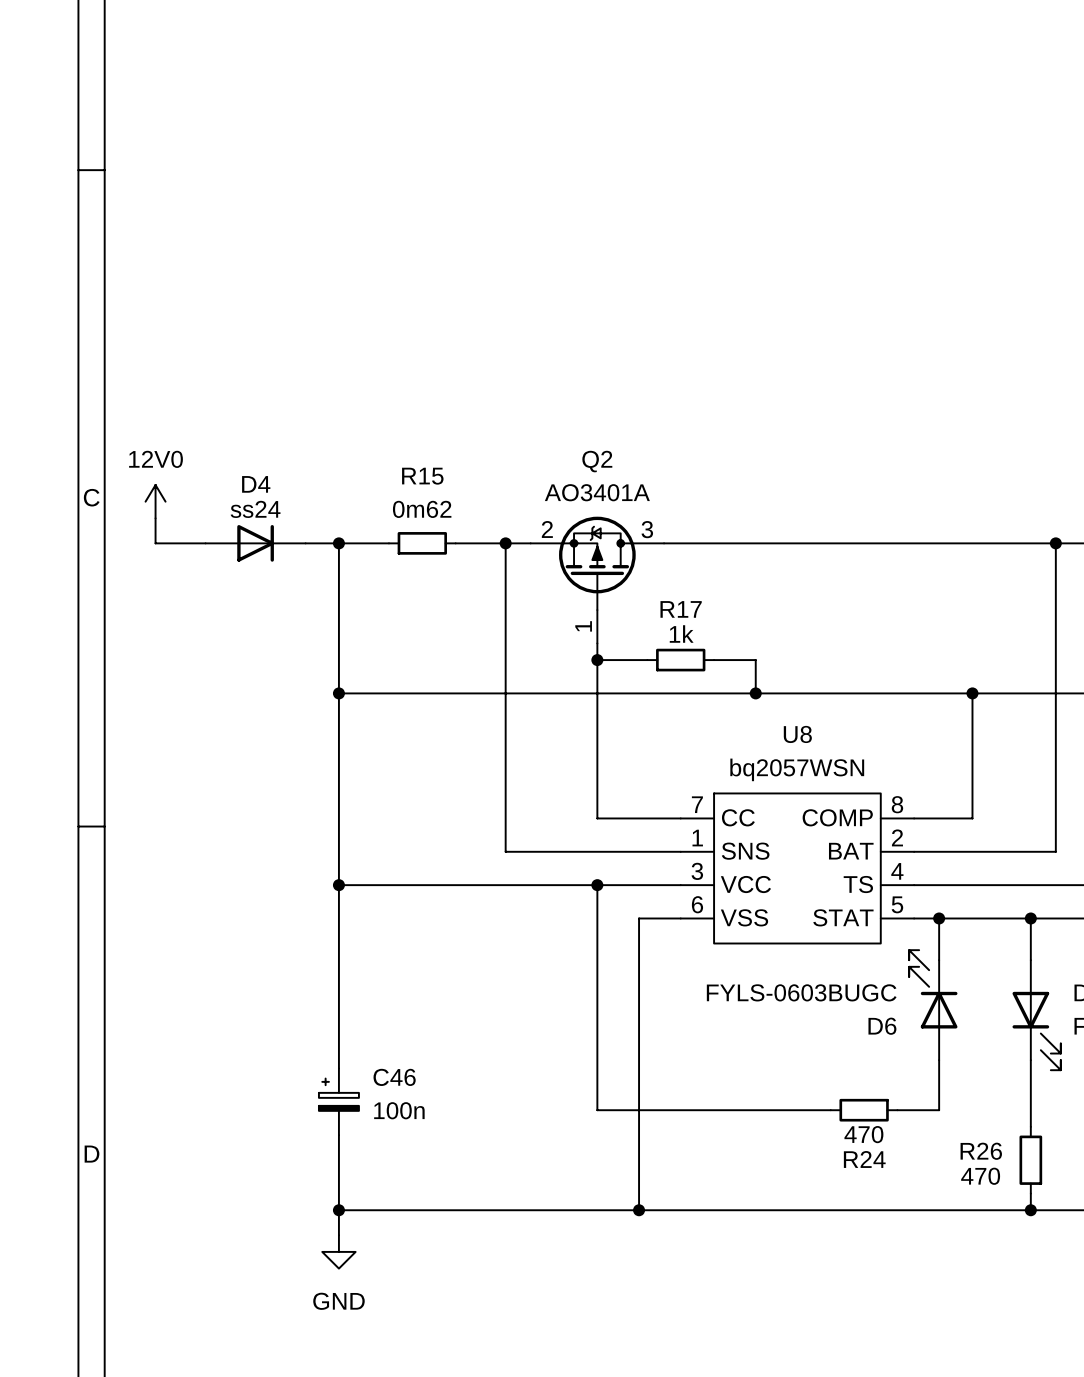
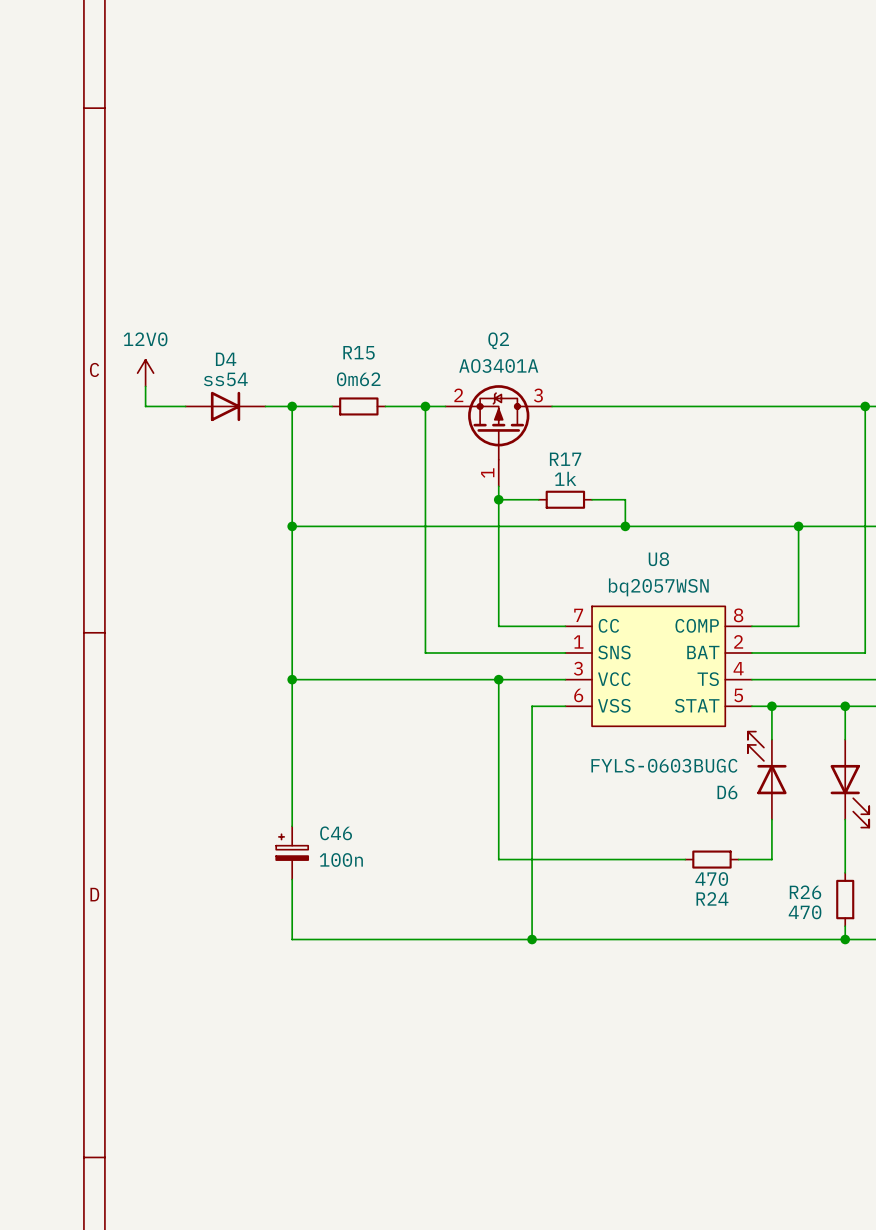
D4 value: ss24 (255, 509) -> ss54 (225, 379)
wire: (338, 1210) (338, 1235) -> none
junction: (338, 1210) -> none
power symbol: GND (338, 1251) -> none

